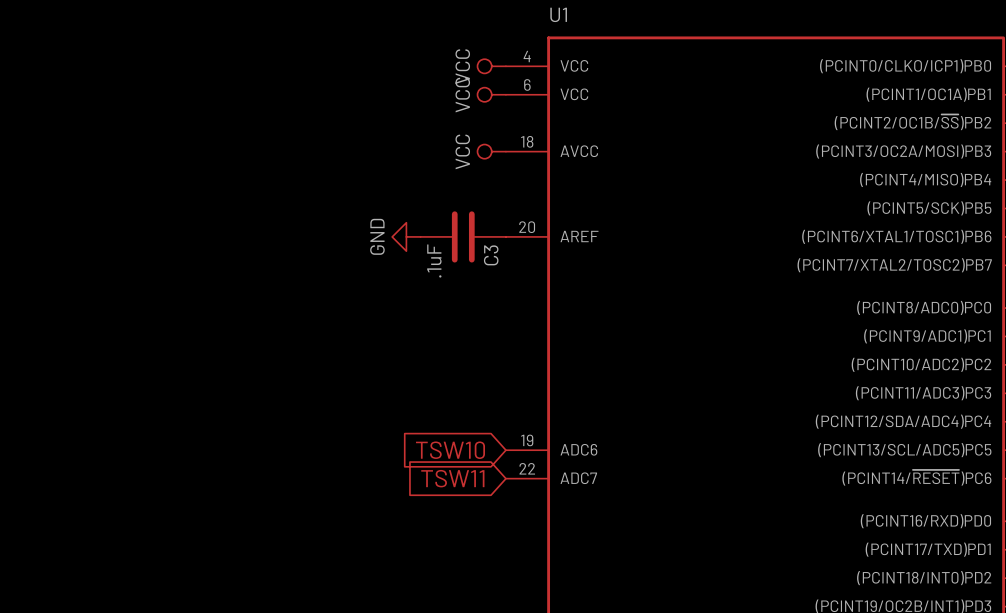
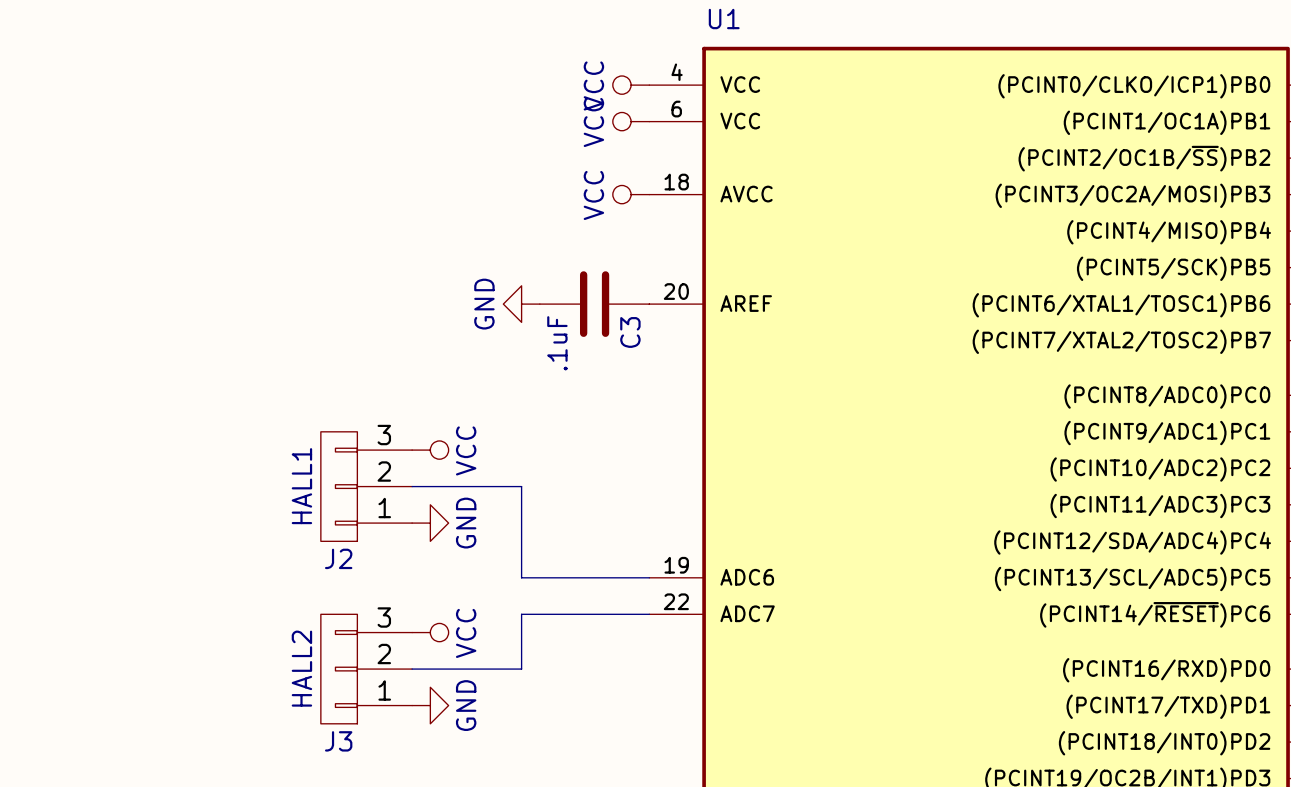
power symbol: none -> VCC (430, 450)
J2: none -> HALL1 (366, 486)
wire: none -> (412, 486) (521, 486) (521, 577) (649, 577)
power symbol: none -> GND (430, 523)
global label: TSW10 (450, 450) -> none
global label: TSW11 (452, 478) -> none
wire: none -> (649, 614) (521, 614) (521, 669) (412, 669)
power symbol: none -> VCC (430, 632)
J3: none -> HALL2 (366, 669)
power symbol: none -> GND (430, 705)

